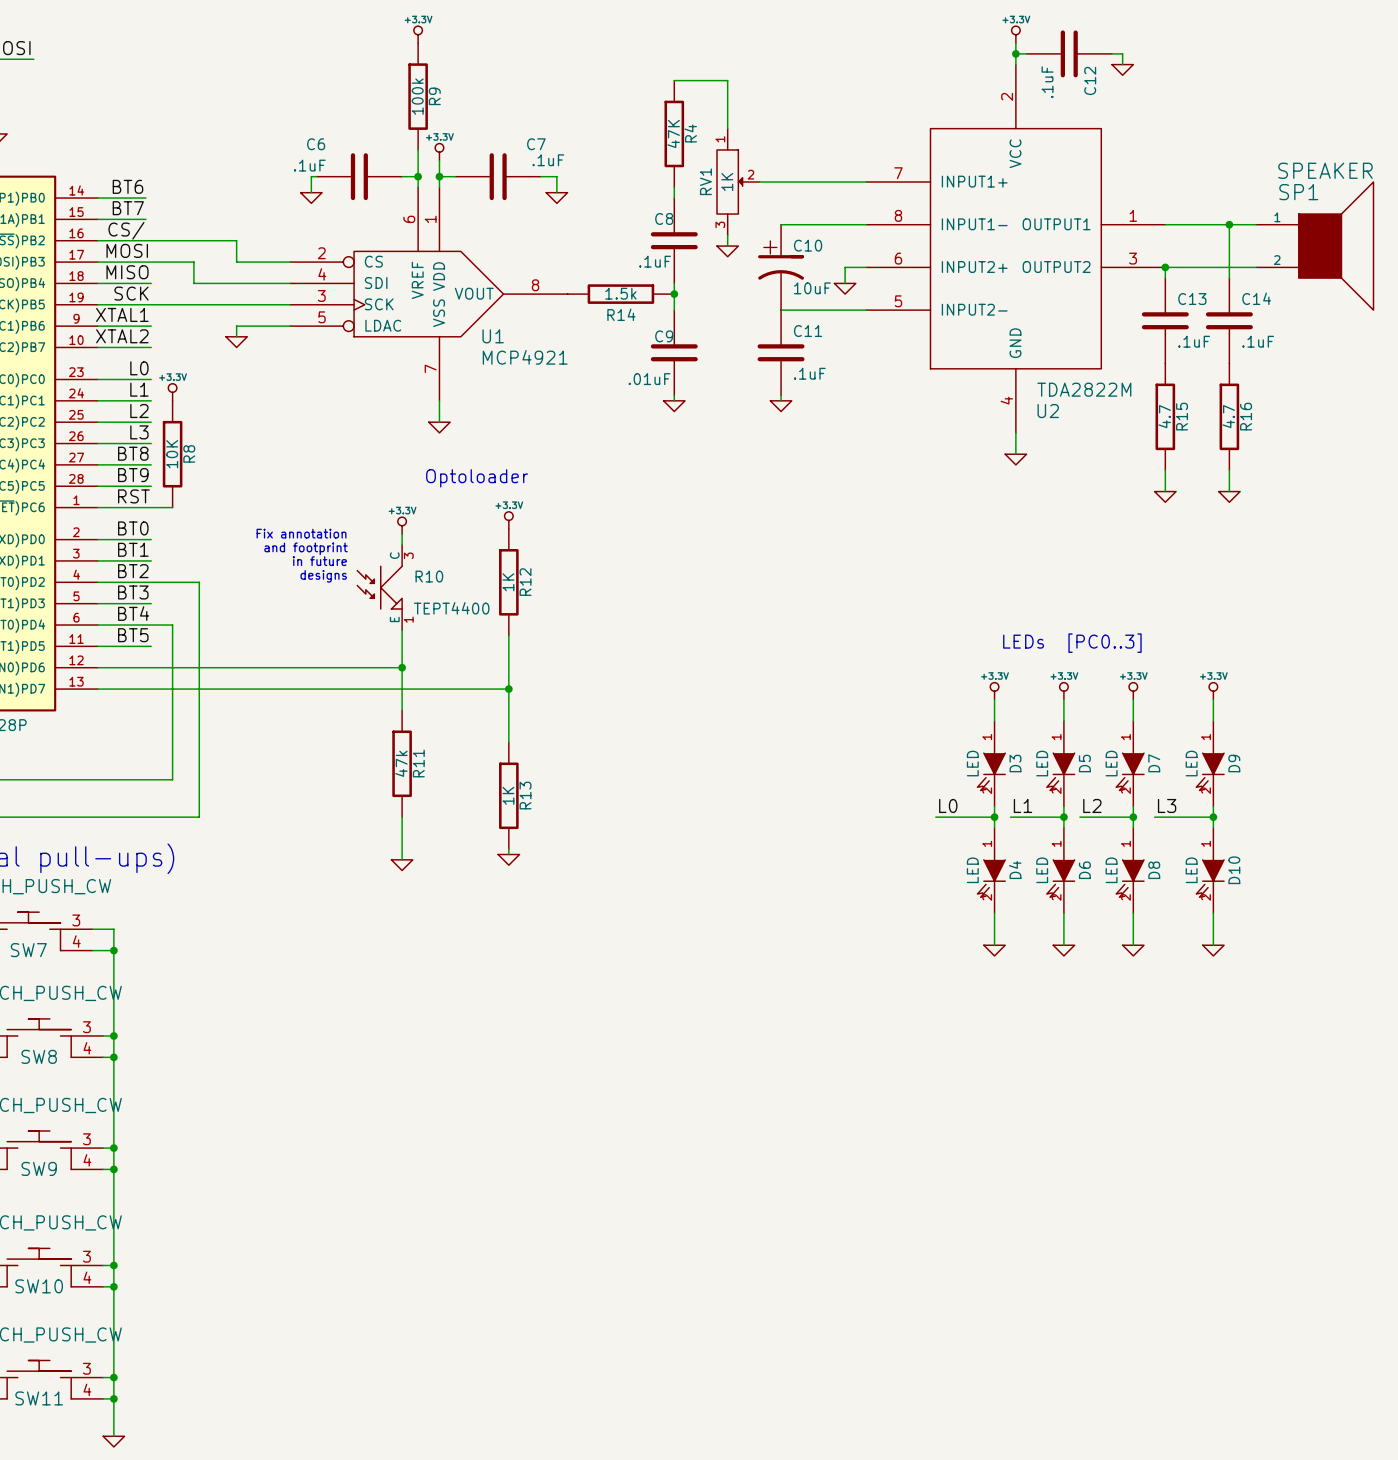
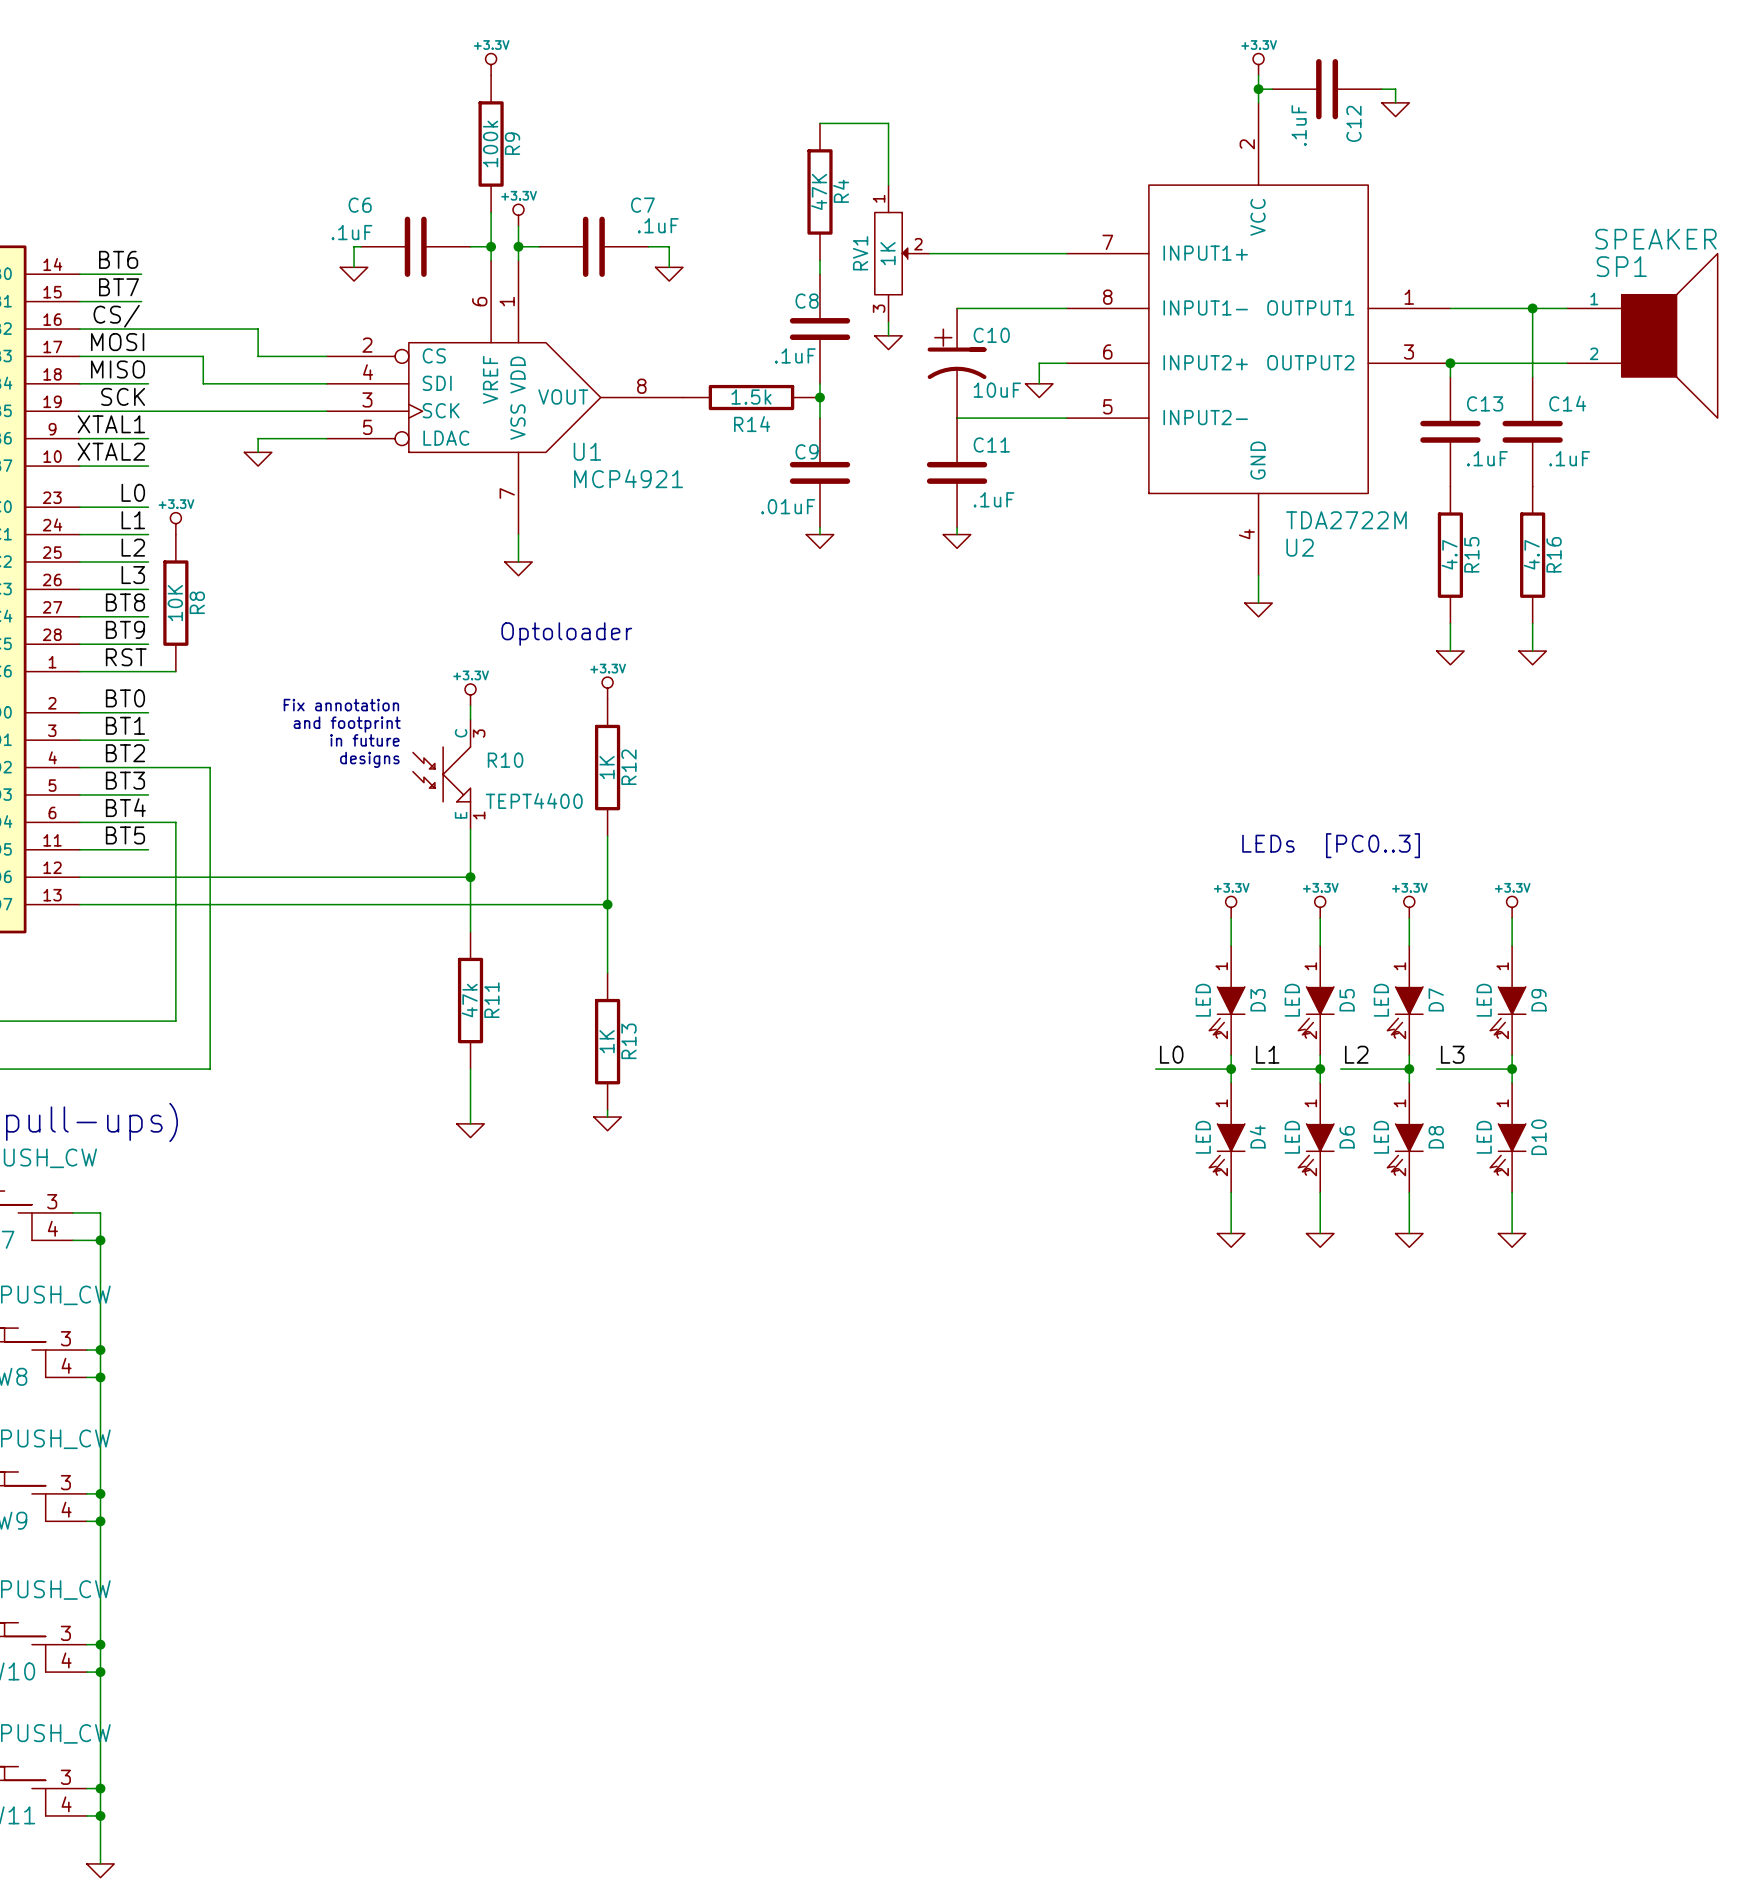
U2 value: TDA2822M (1084, 389) -> TDA2722M (1346, 520)

